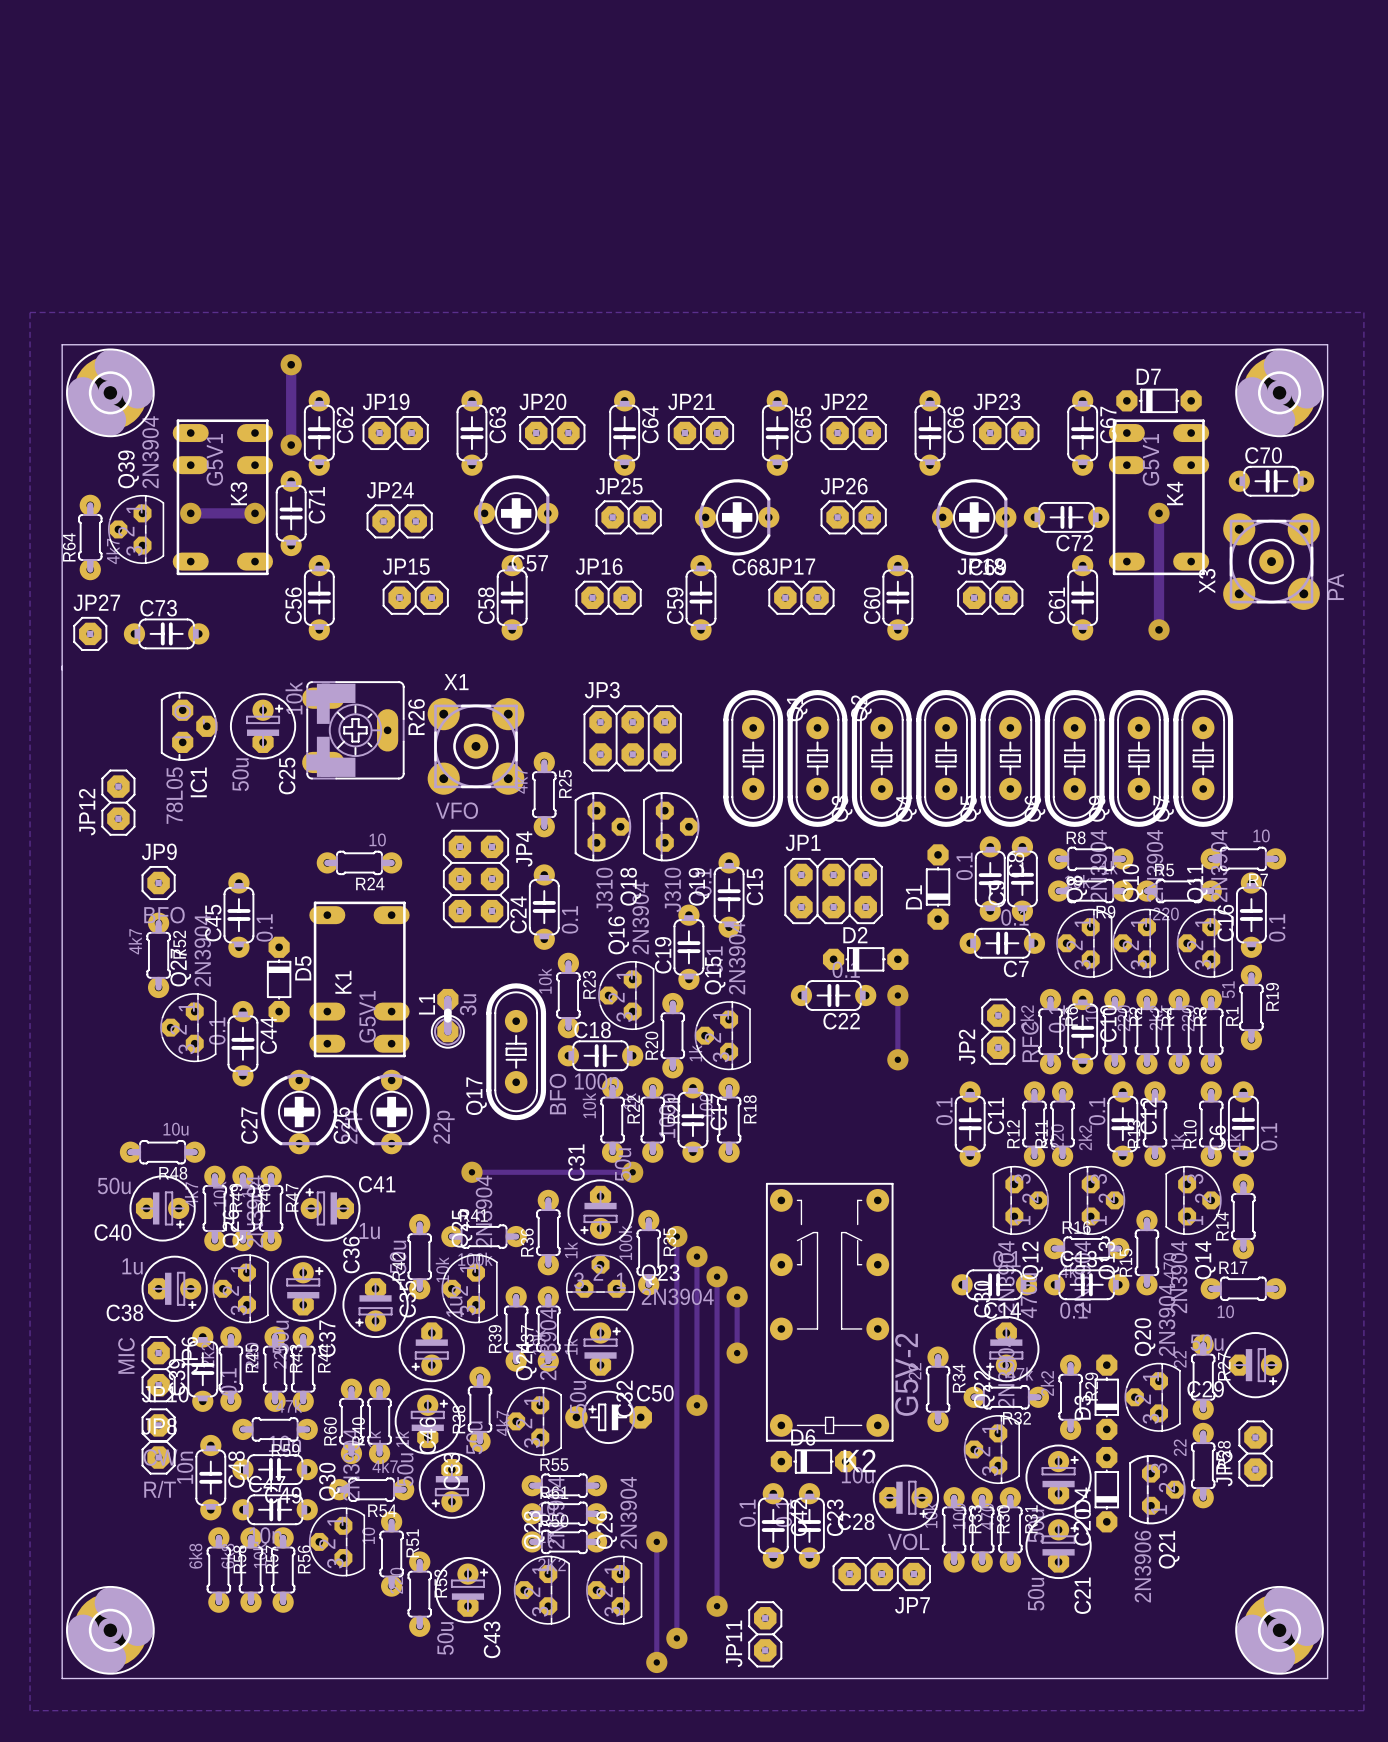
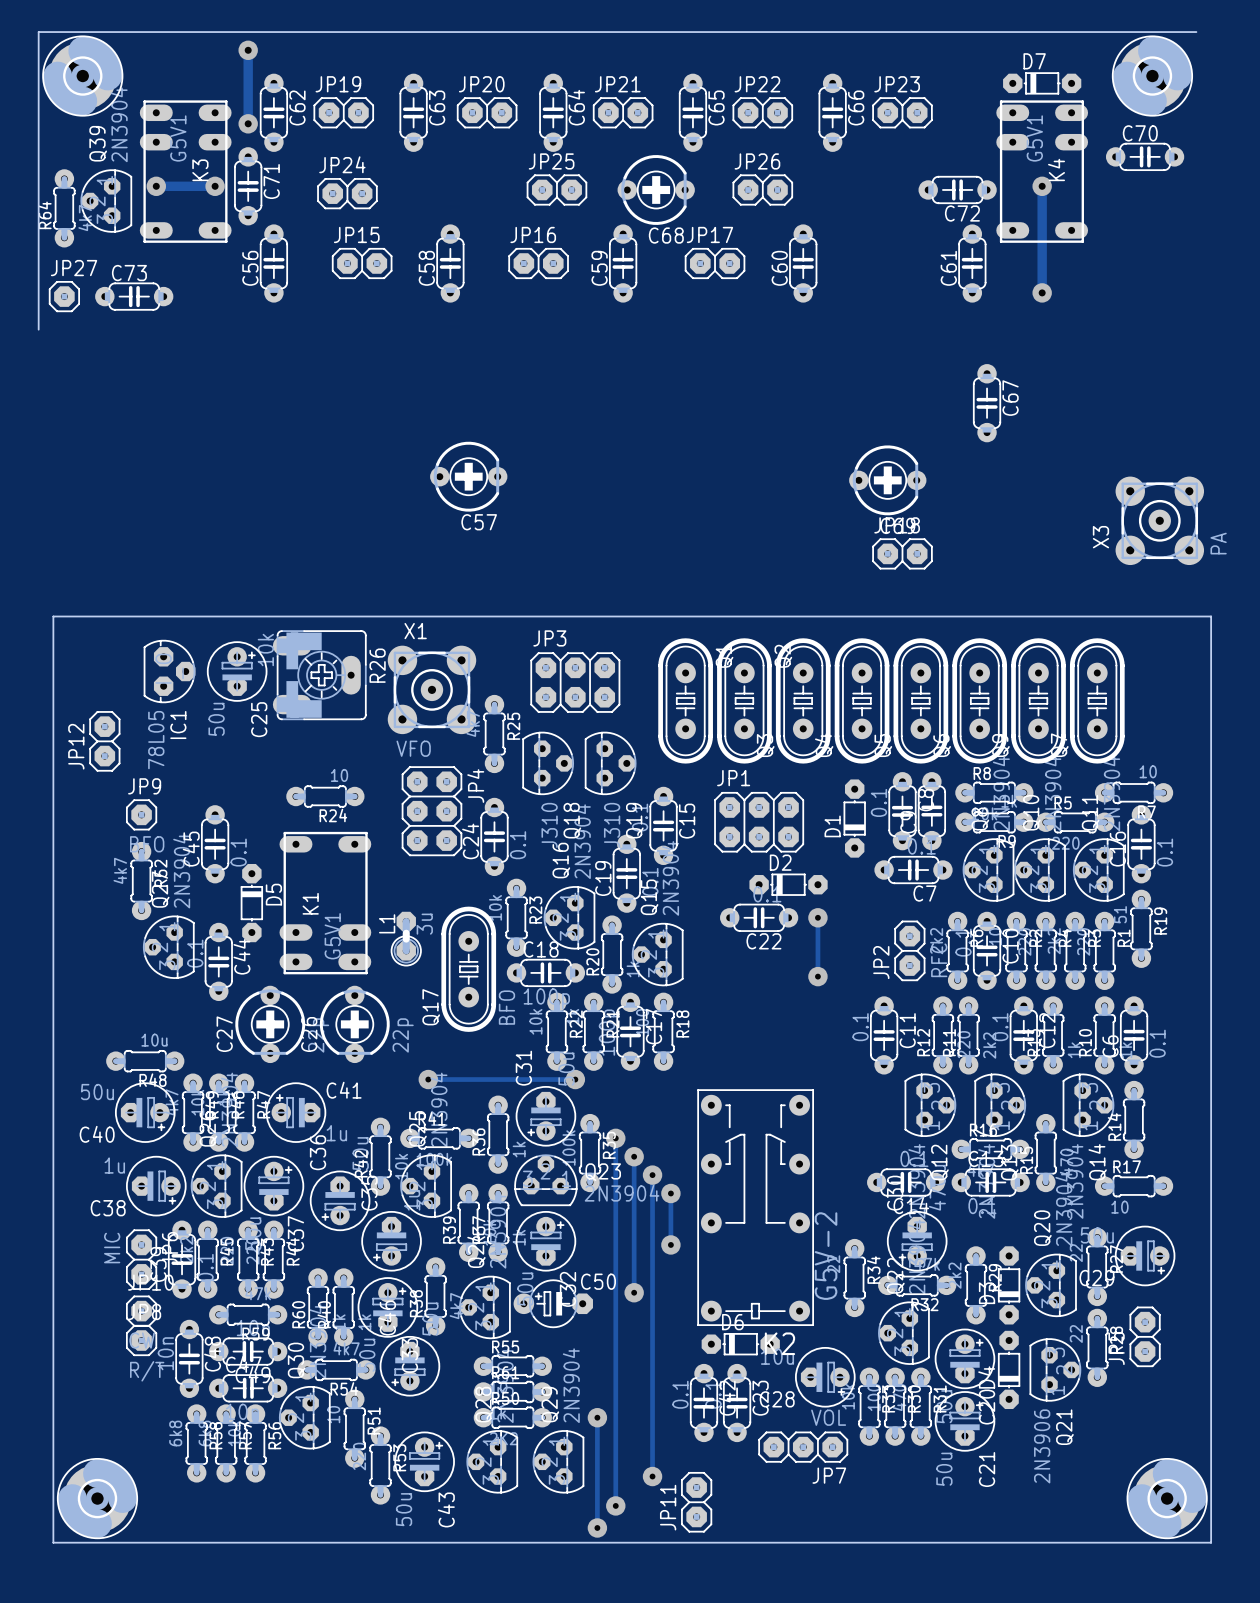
board edge: none -> (1196, 32) (38, 32) (38, 329)
track: none -> (248, 50) (248, 123)
via: none -> (248, 50)
part: none -> (82, 76)
part: none -> (1152, 76)
via: none -> (248, 123)
track: none -> (156, 186) (215, 186)
via: none -> (156, 186)
via: none -> (215, 186)
track: none -> (1042, 186) (1042, 292)
via: none -> (1042, 186)
zone outline: (30, 312) (1363, 312) (1363, 1710) (30, 1710) (30, 312) -> none
via: none -> (1042, 292)
track: (291, 364) (291, 445) -> none
via: (291, 364) -> none
part: (110, 392) -> none
part: (1279, 392) -> none
D7 position: (1159, 400) -> (1042, 83)
K4 footprint: [1108, 419, 1210, 576] -> [996, 100, 1089, 243]
C62 position: (319, 433) -> (273, 112)
JP19 position: (395, 433) -> (343, 112)
C63 position: (471, 433) -> (413, 112)
JP20 position: (552, 433) -> (487, 112)
C64 position: (624, 433) -> (553, 112)
JP21 position: (700, 433) -> (623, 112)
C65 position: (777, 433) -> (692, 112)
JP22 position: (853, 433) -> (762, 112)
C66 position: (930, 433) -> (832, 112)
JP23 position: (1006, 433) -> (902, 112)
via: (291, 445) -> none
C70 position: (1271, 481) -> (1145, 156)
K3 position: (222, 497) -> (185, 171)
track: (190, 513) (255, 513) -> none
via: (190, 513) -> none
via: (255, 513) -> none
C71 position: (291, 513) -> (248, 186)
track: (1159, 513) (1159, 629) -> none
via: (1159, 513) -> none
JP25 position: (628, 517) -> (556, 189)
C68 position: (737, 517) -> (656, 189)
JP26 position: (853, 517) -> (762, 189)
C72 position: (1066, 517) -> (957, 189)
JP24 position: (399, 521) -> (347, 193)
Q39 position: (136, 529) -> (106, 201)
R64 position: (90, 537) -> (64, 208)
C56 position: (319, 597) -> (273, 263)
JP15 position: (415, 597) -> (362, 263)
C58 position: (512, 597) -> (450, 263)
JP16 position: (608, 597) -> (538, 263)
C59 position: (700, 597) -> (623, 263)
JP17 position: (801, 597) -> (715, 263)
C60 position: (897, 597) -> (803, 263)
C61 position: (1082, 597) -> (972, 263)
via: (1159, 629) -> none
JP27 position: (90, 633) -> (64, 296)
C73 position: (166, 633) -> (134, 296)
board edge: (62, 666) (62, 344) (1327, 344) (1327, 666) -> (53, 616) (1211, 616)

